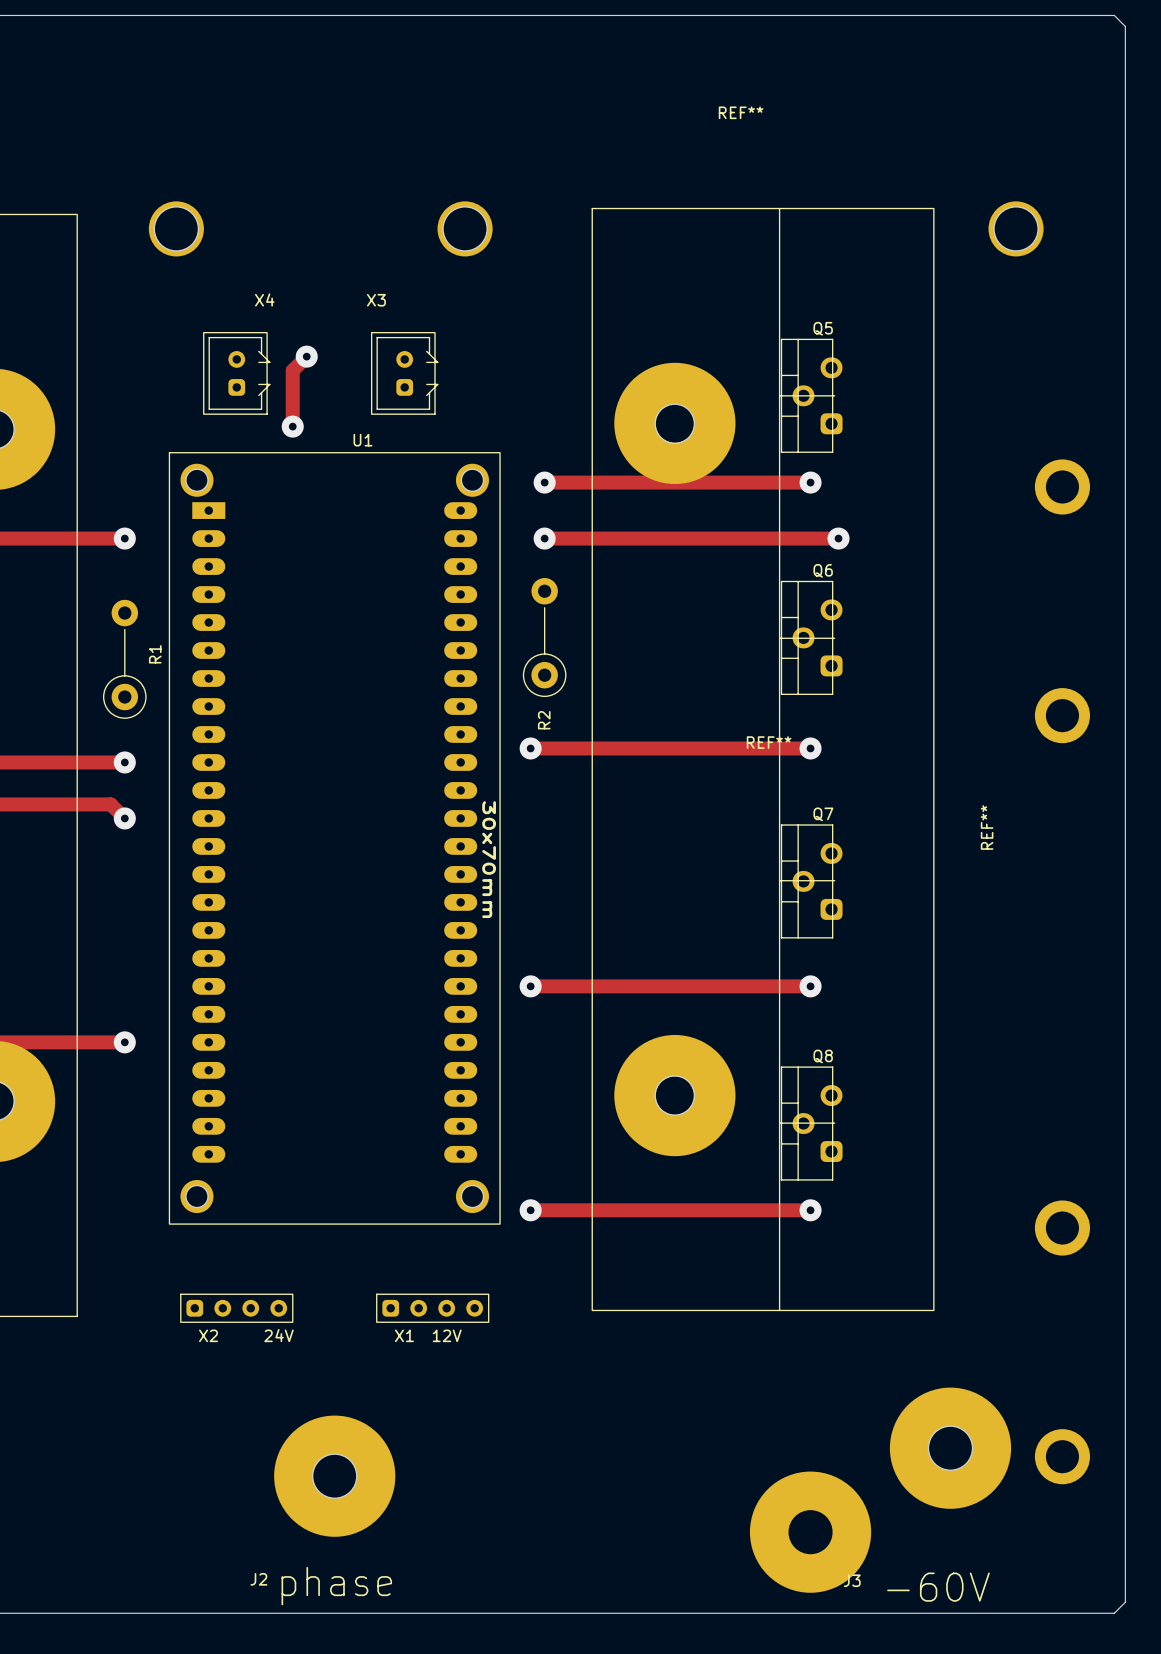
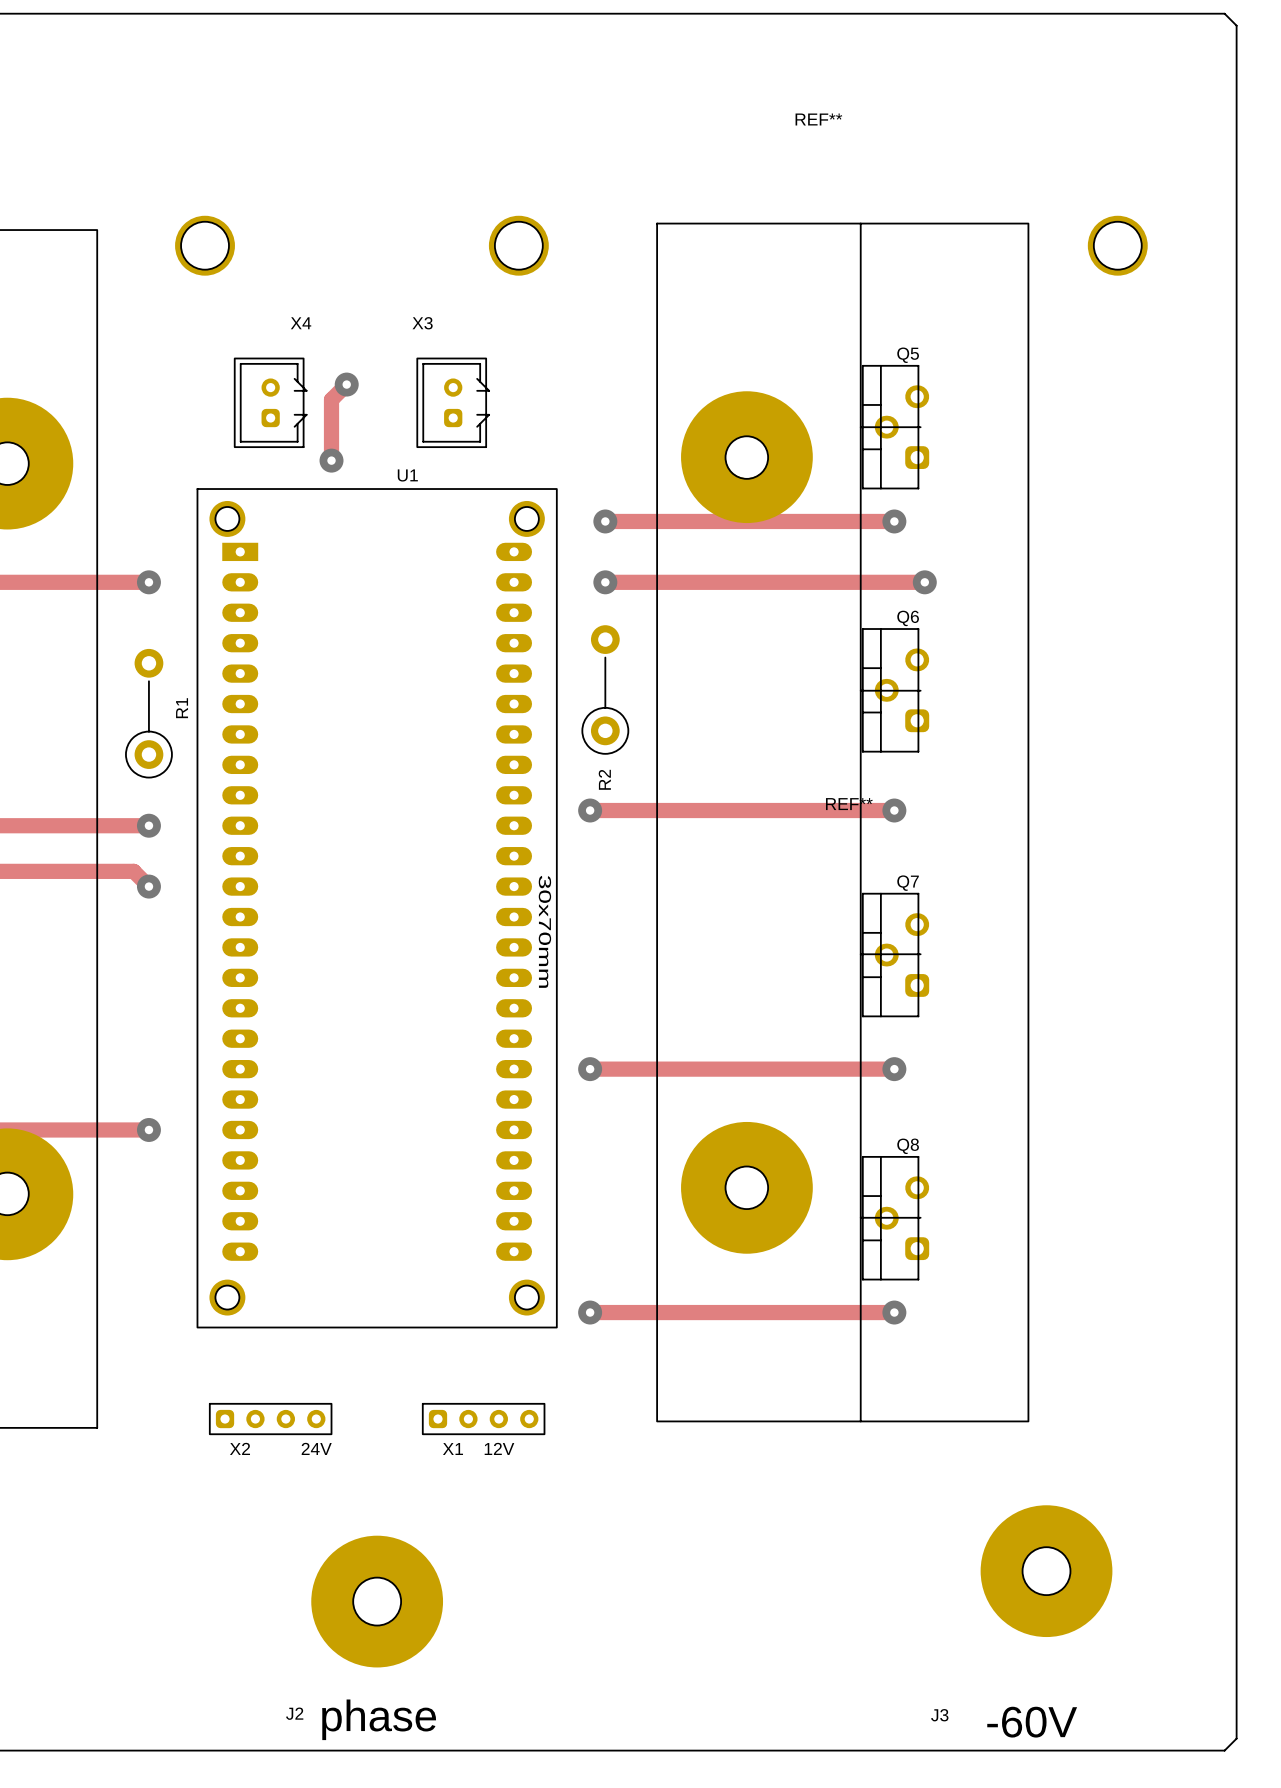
REF**: (1062, 971) -> none
part: (810, 1532) -> none

